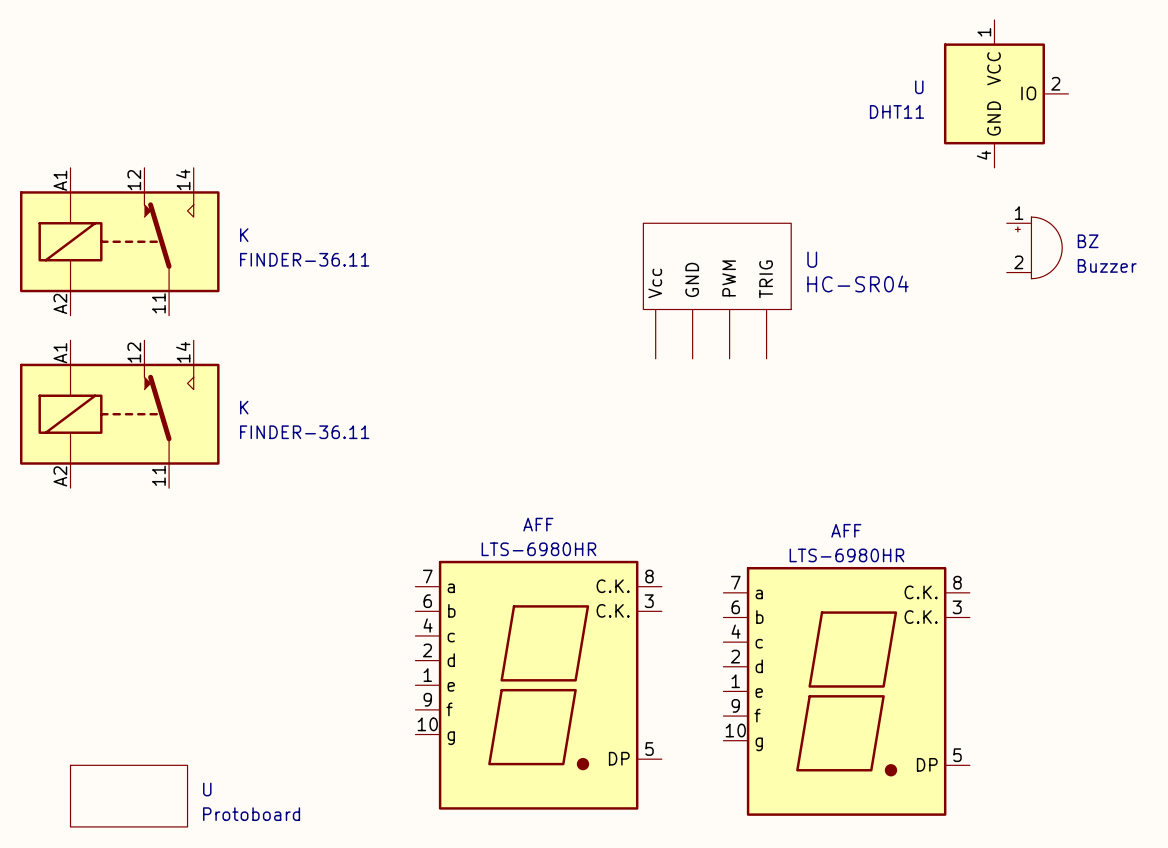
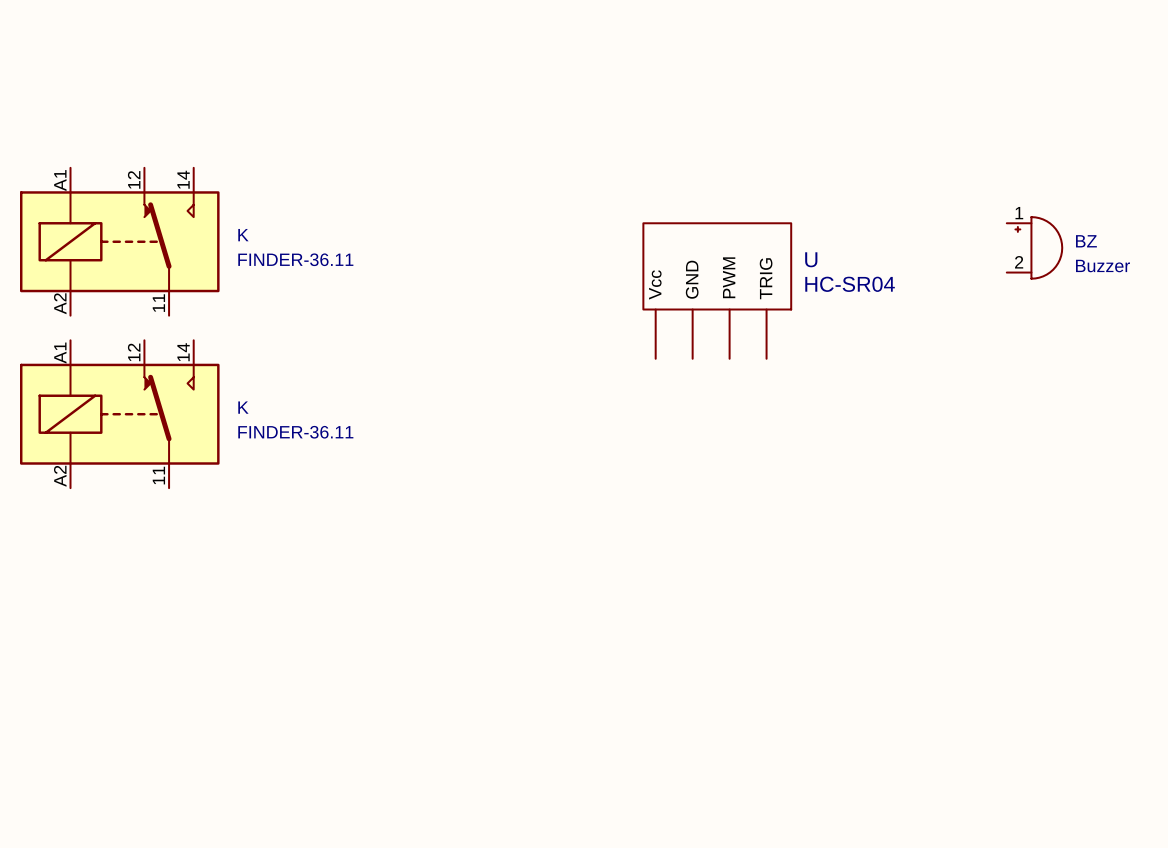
U: DHT11 (1006, 93) -> none
AFF: LTS-6980HR (538, 685) -> none
AFF: LTS-6980HR (846, 691) -> none
U: Protoboard (129, 796) -> none

